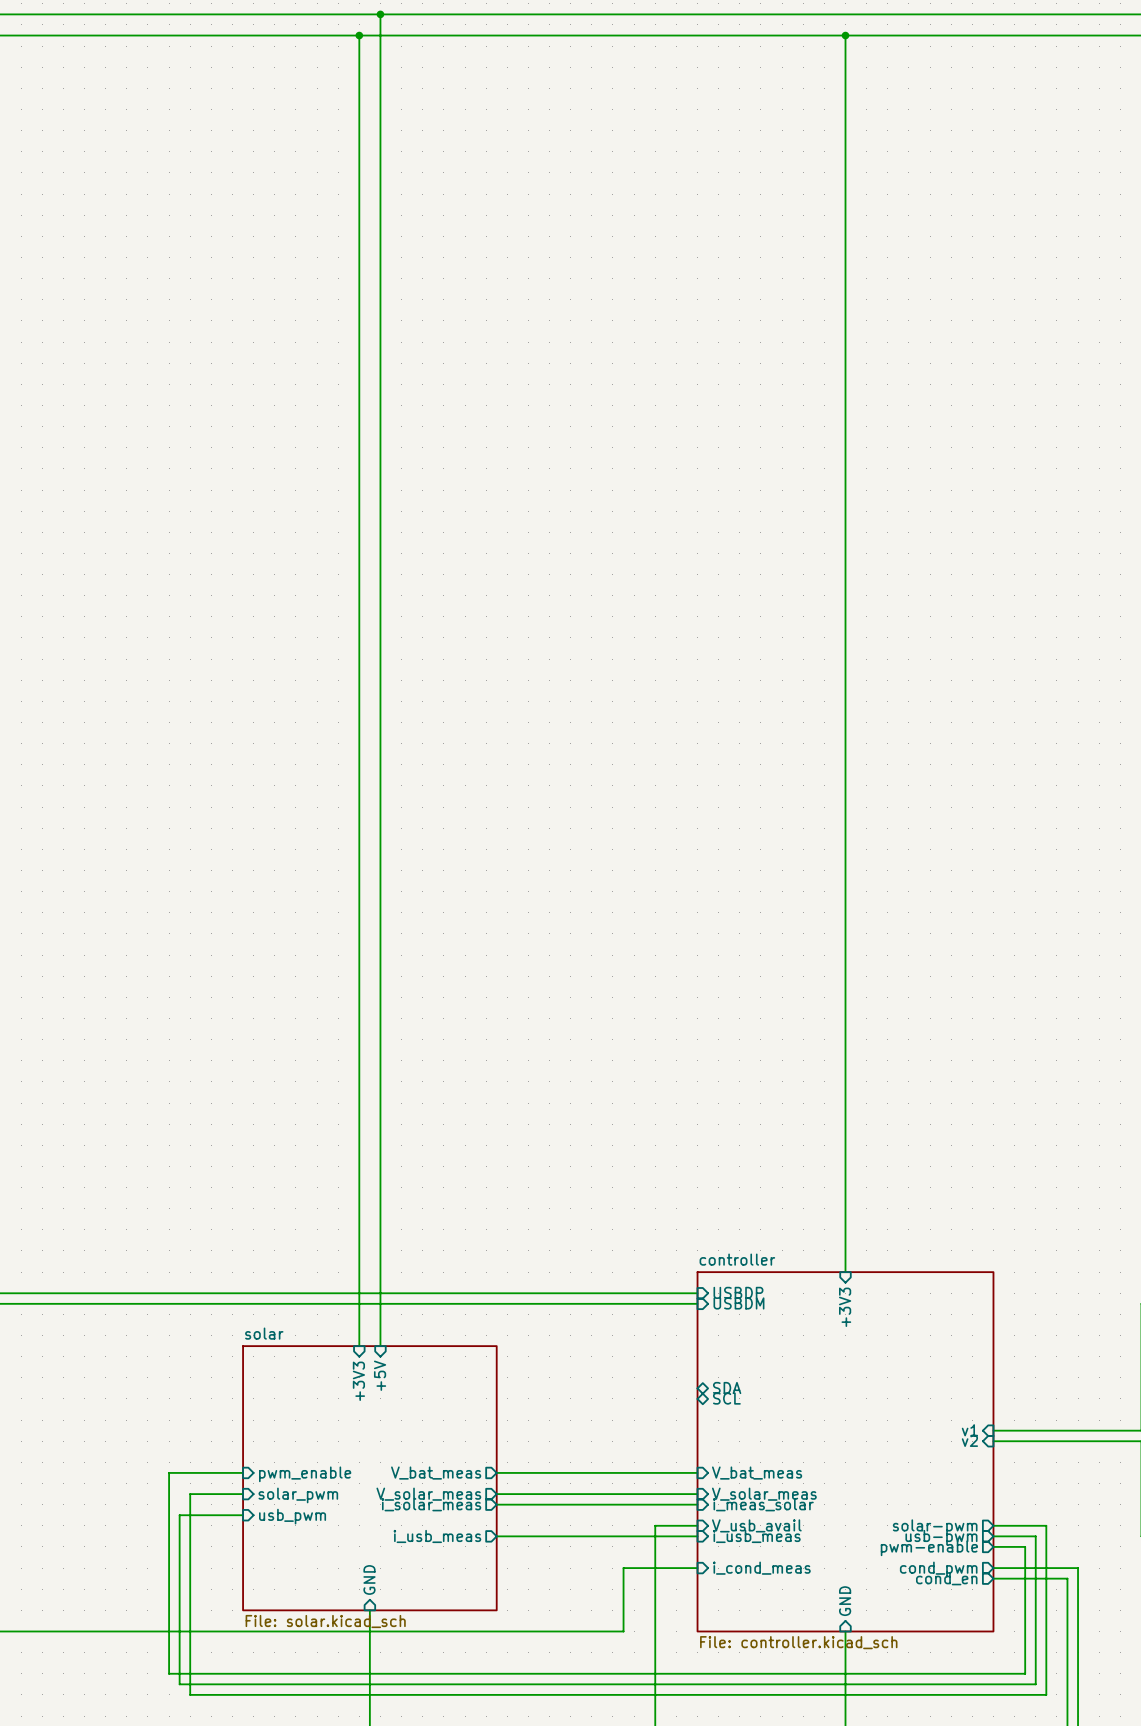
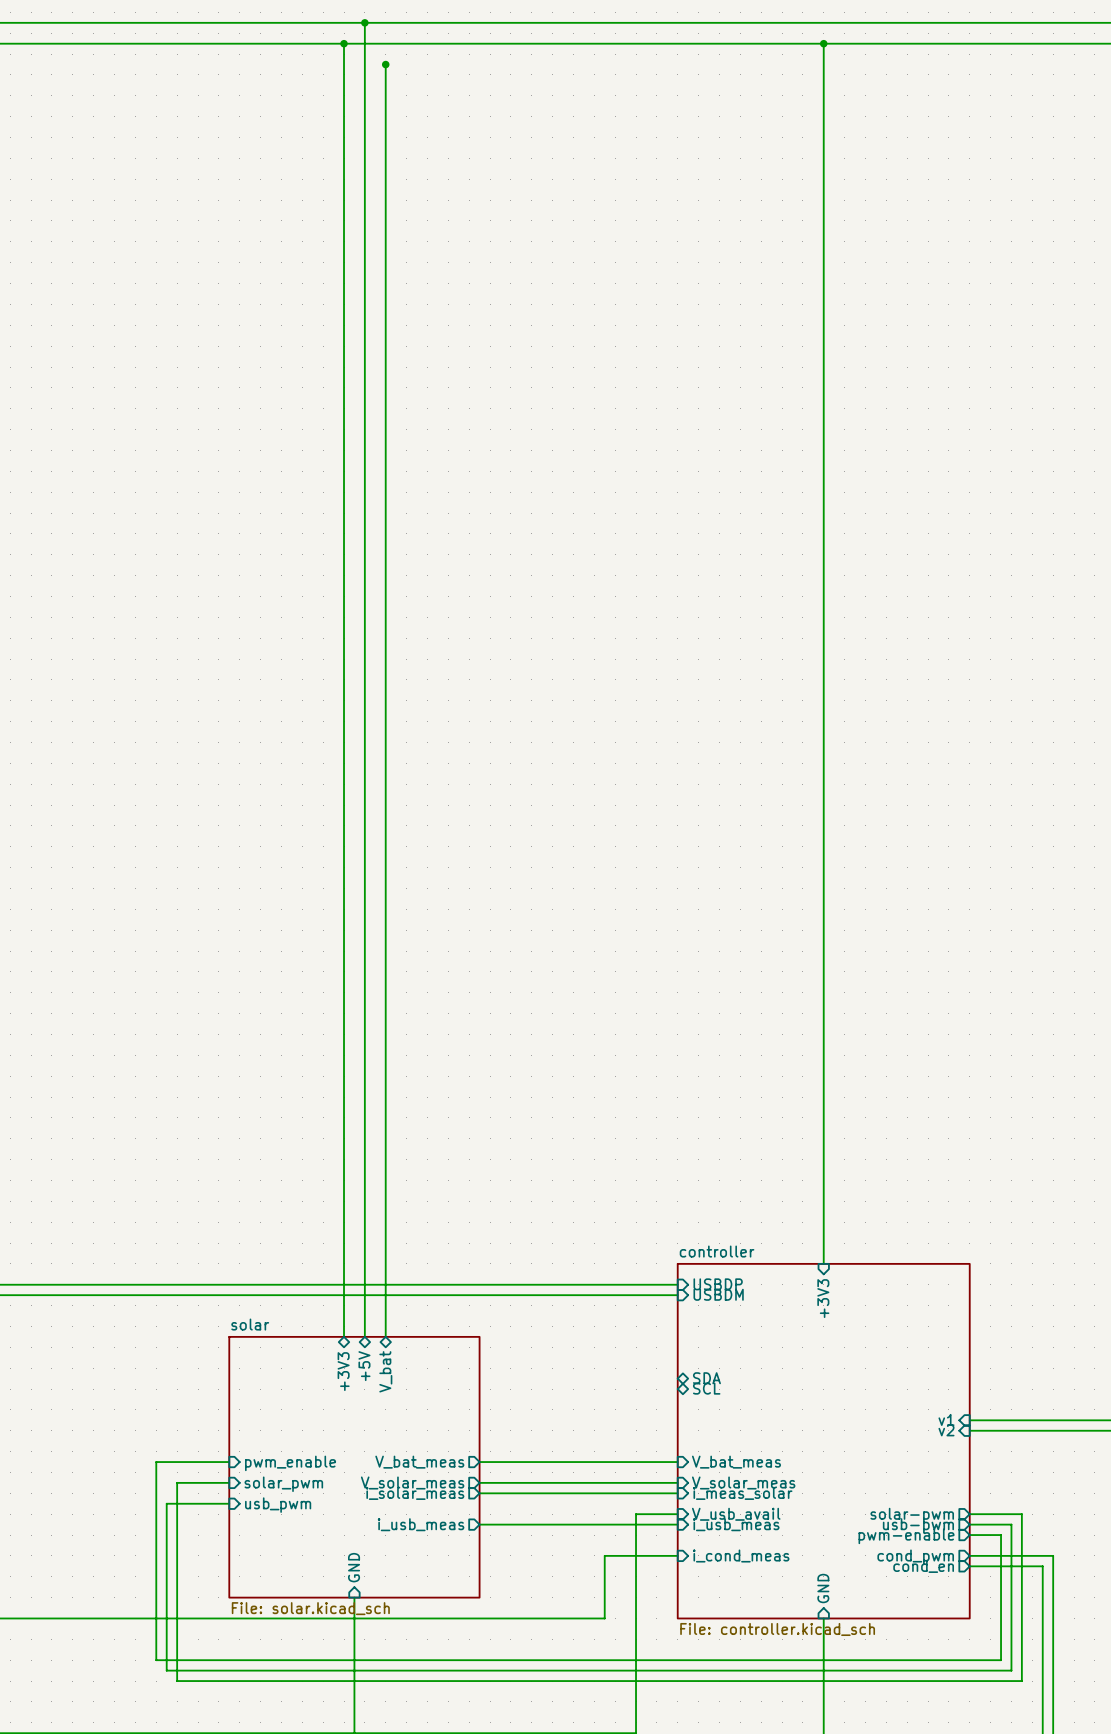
wire: none -> (385, 64) (385, 1336)
junction: none -> (385, 64)
sheet pin shape: input (380, 1375) -> bidirectional (364, 1366)
sheet pin shape: input (358, 1381) -> bidirectional (343, 1371)
sheet pin: none -> V_bat (385, 1371)

